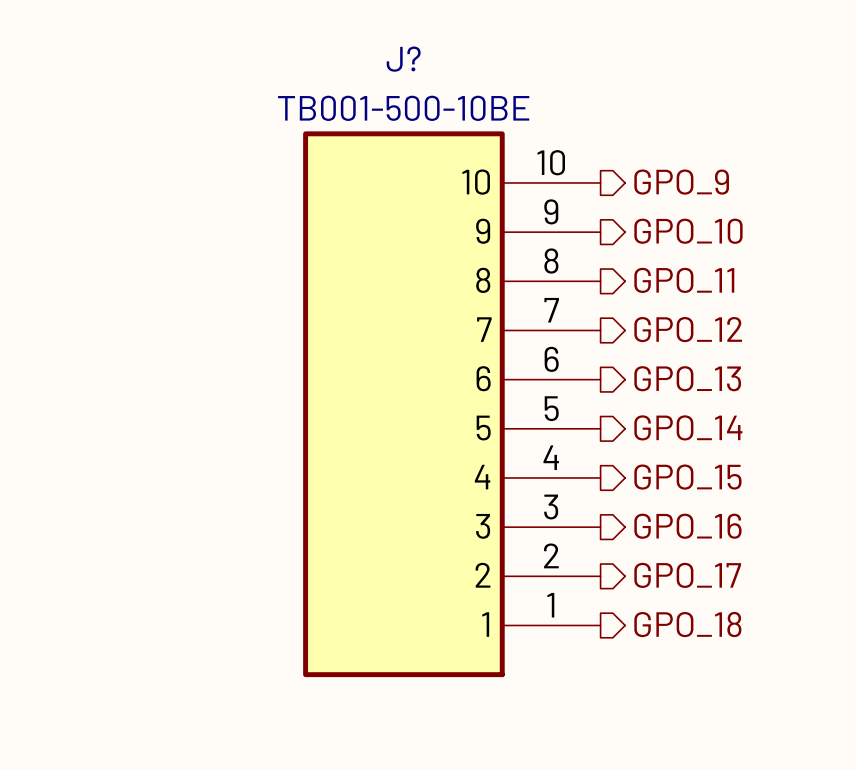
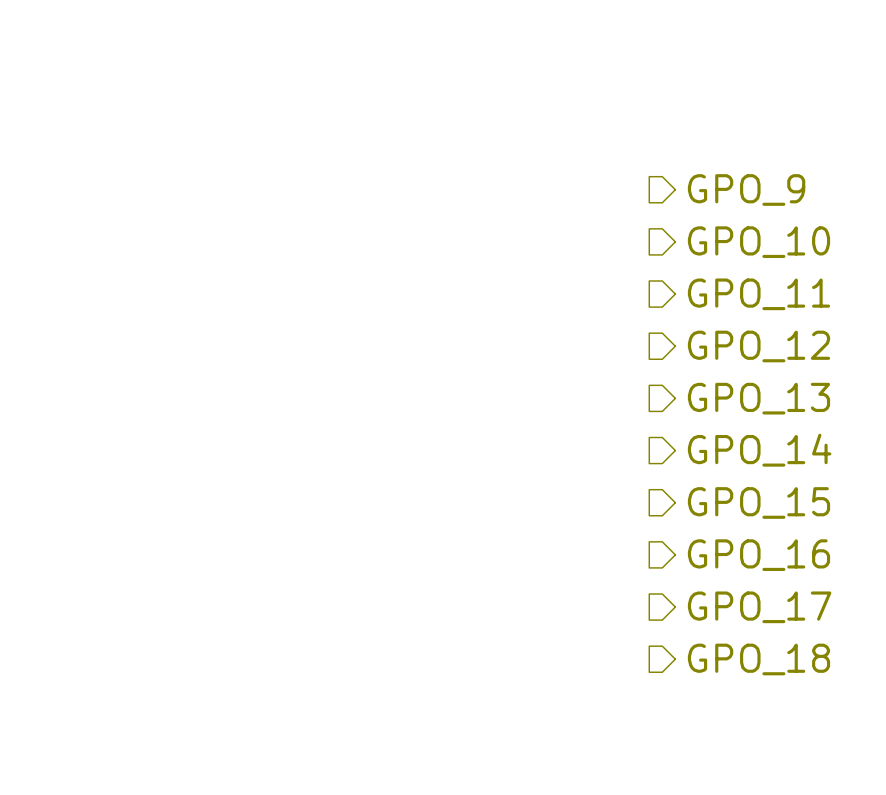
J?: TB001-500-10BE (451, 404) -> none

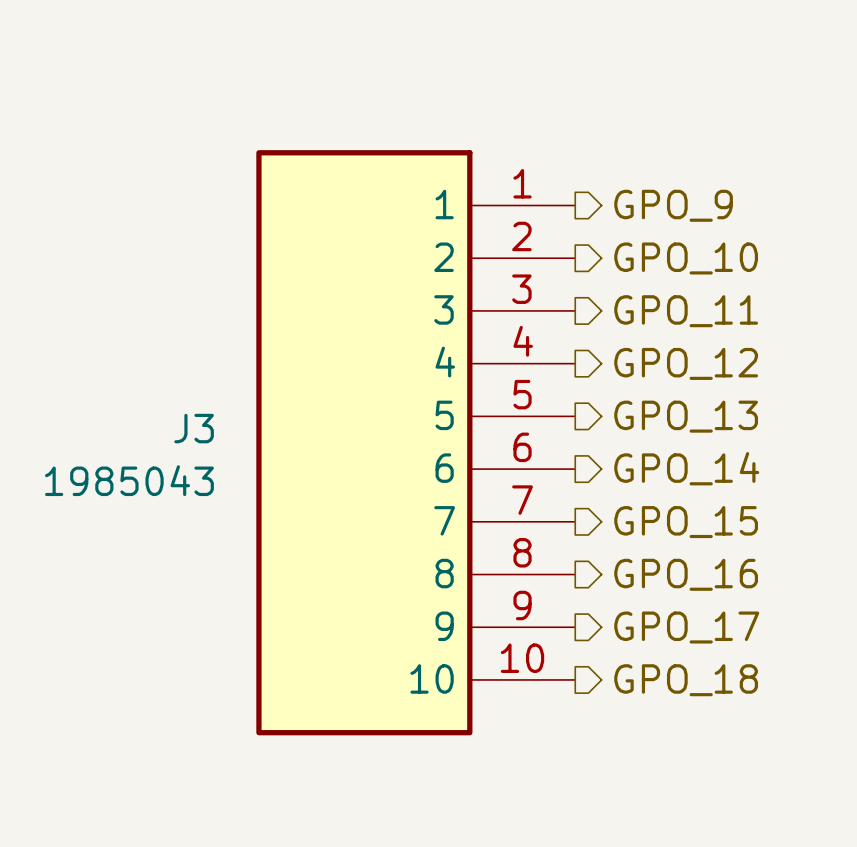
J3: none -> 1985043 (415, 442)

